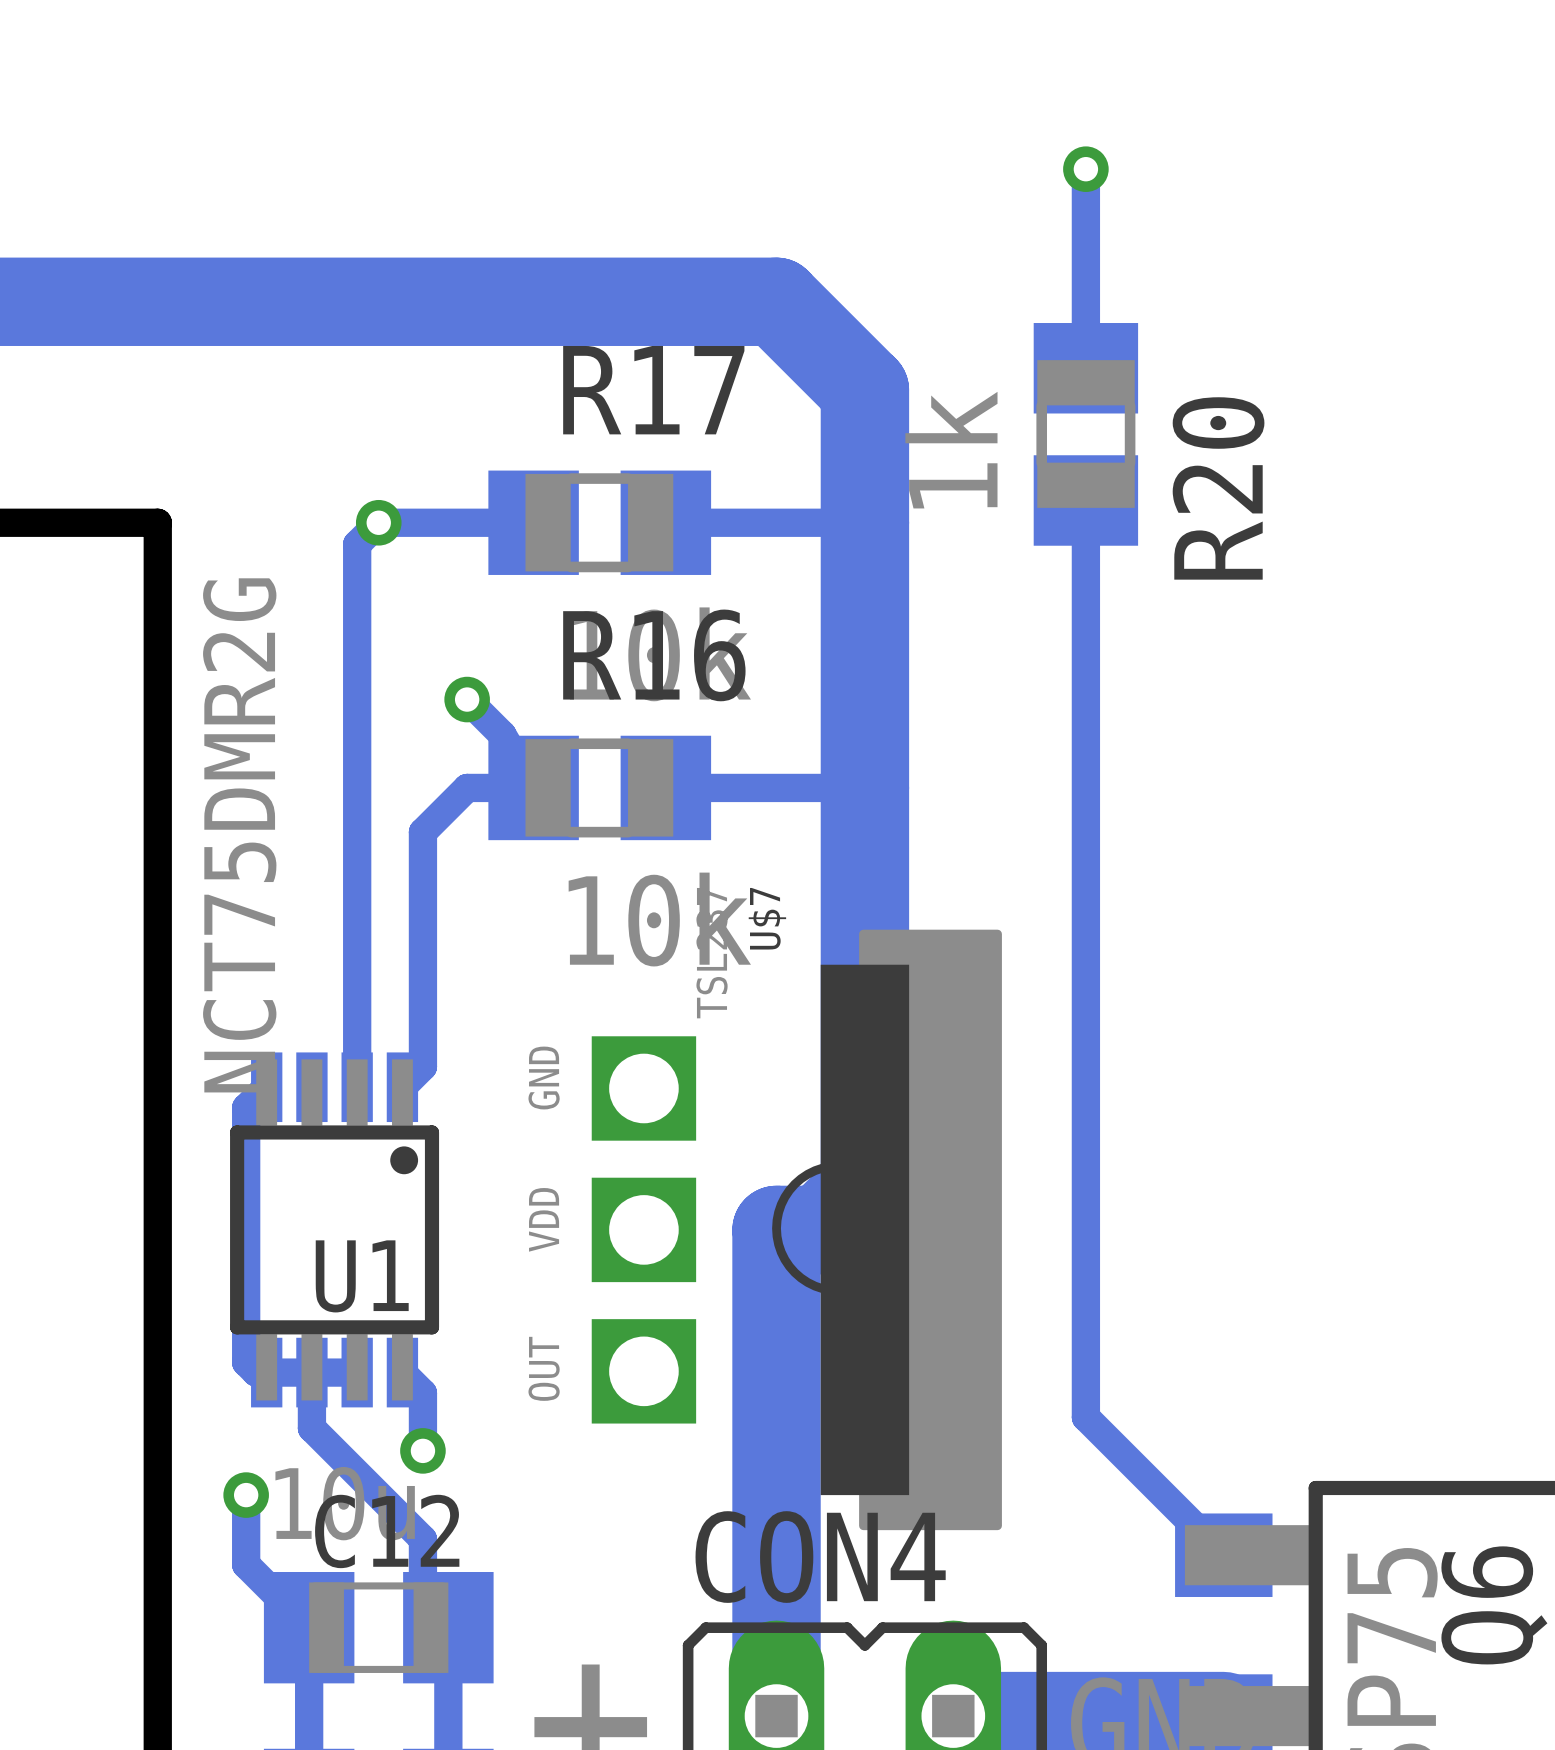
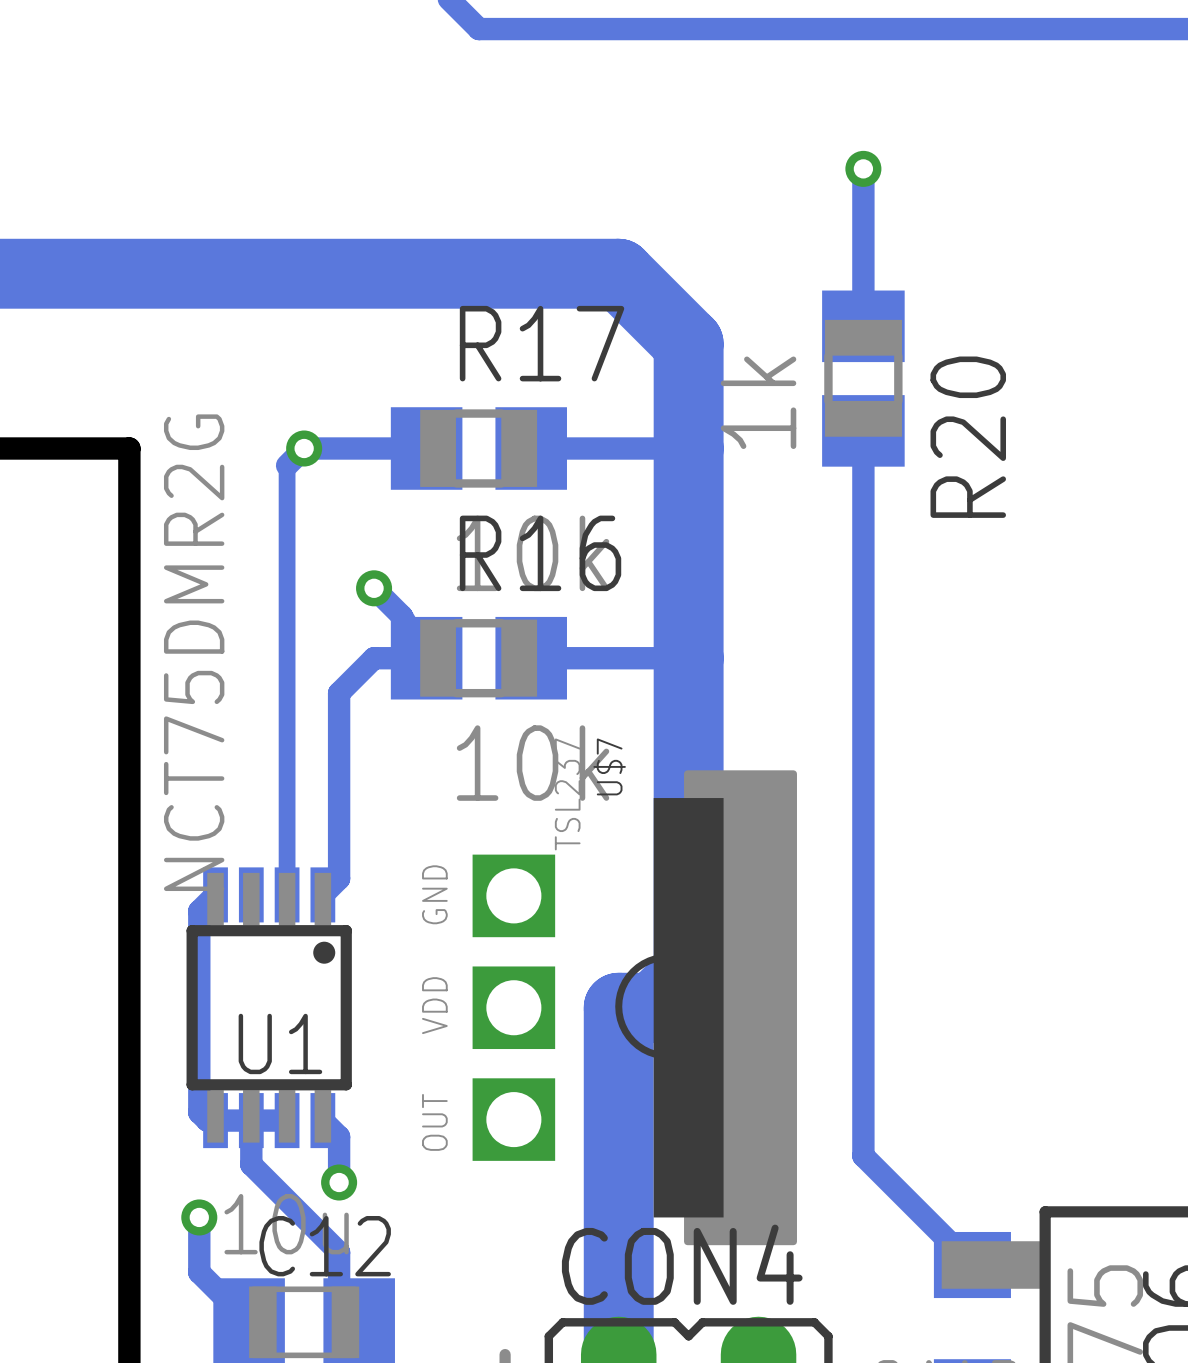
track width: thick (357, 544) (357, 1087) -> thin (287, 465) (287, 894)

